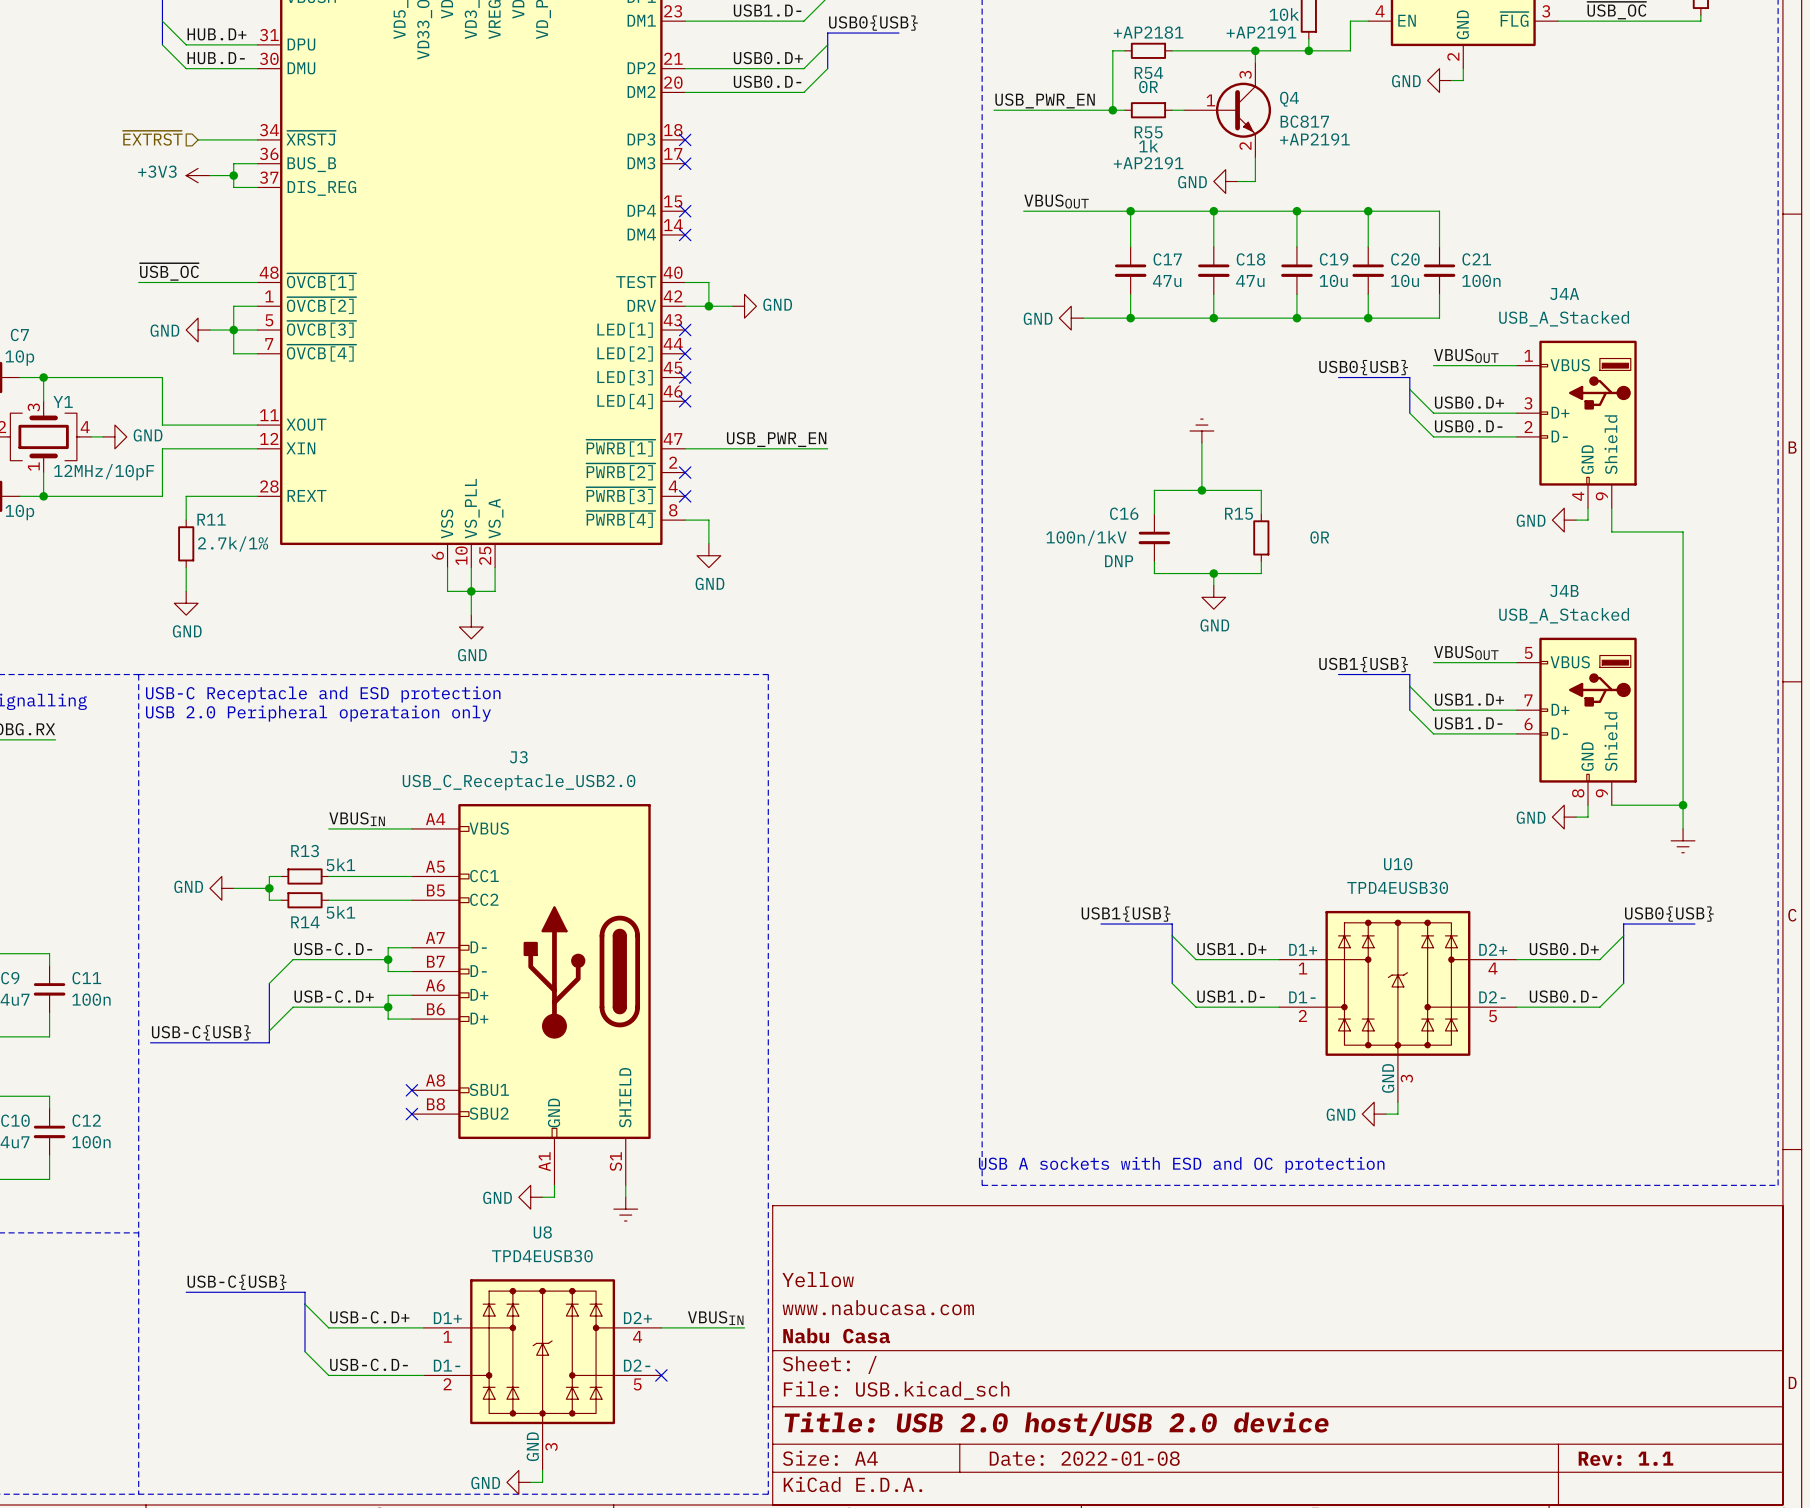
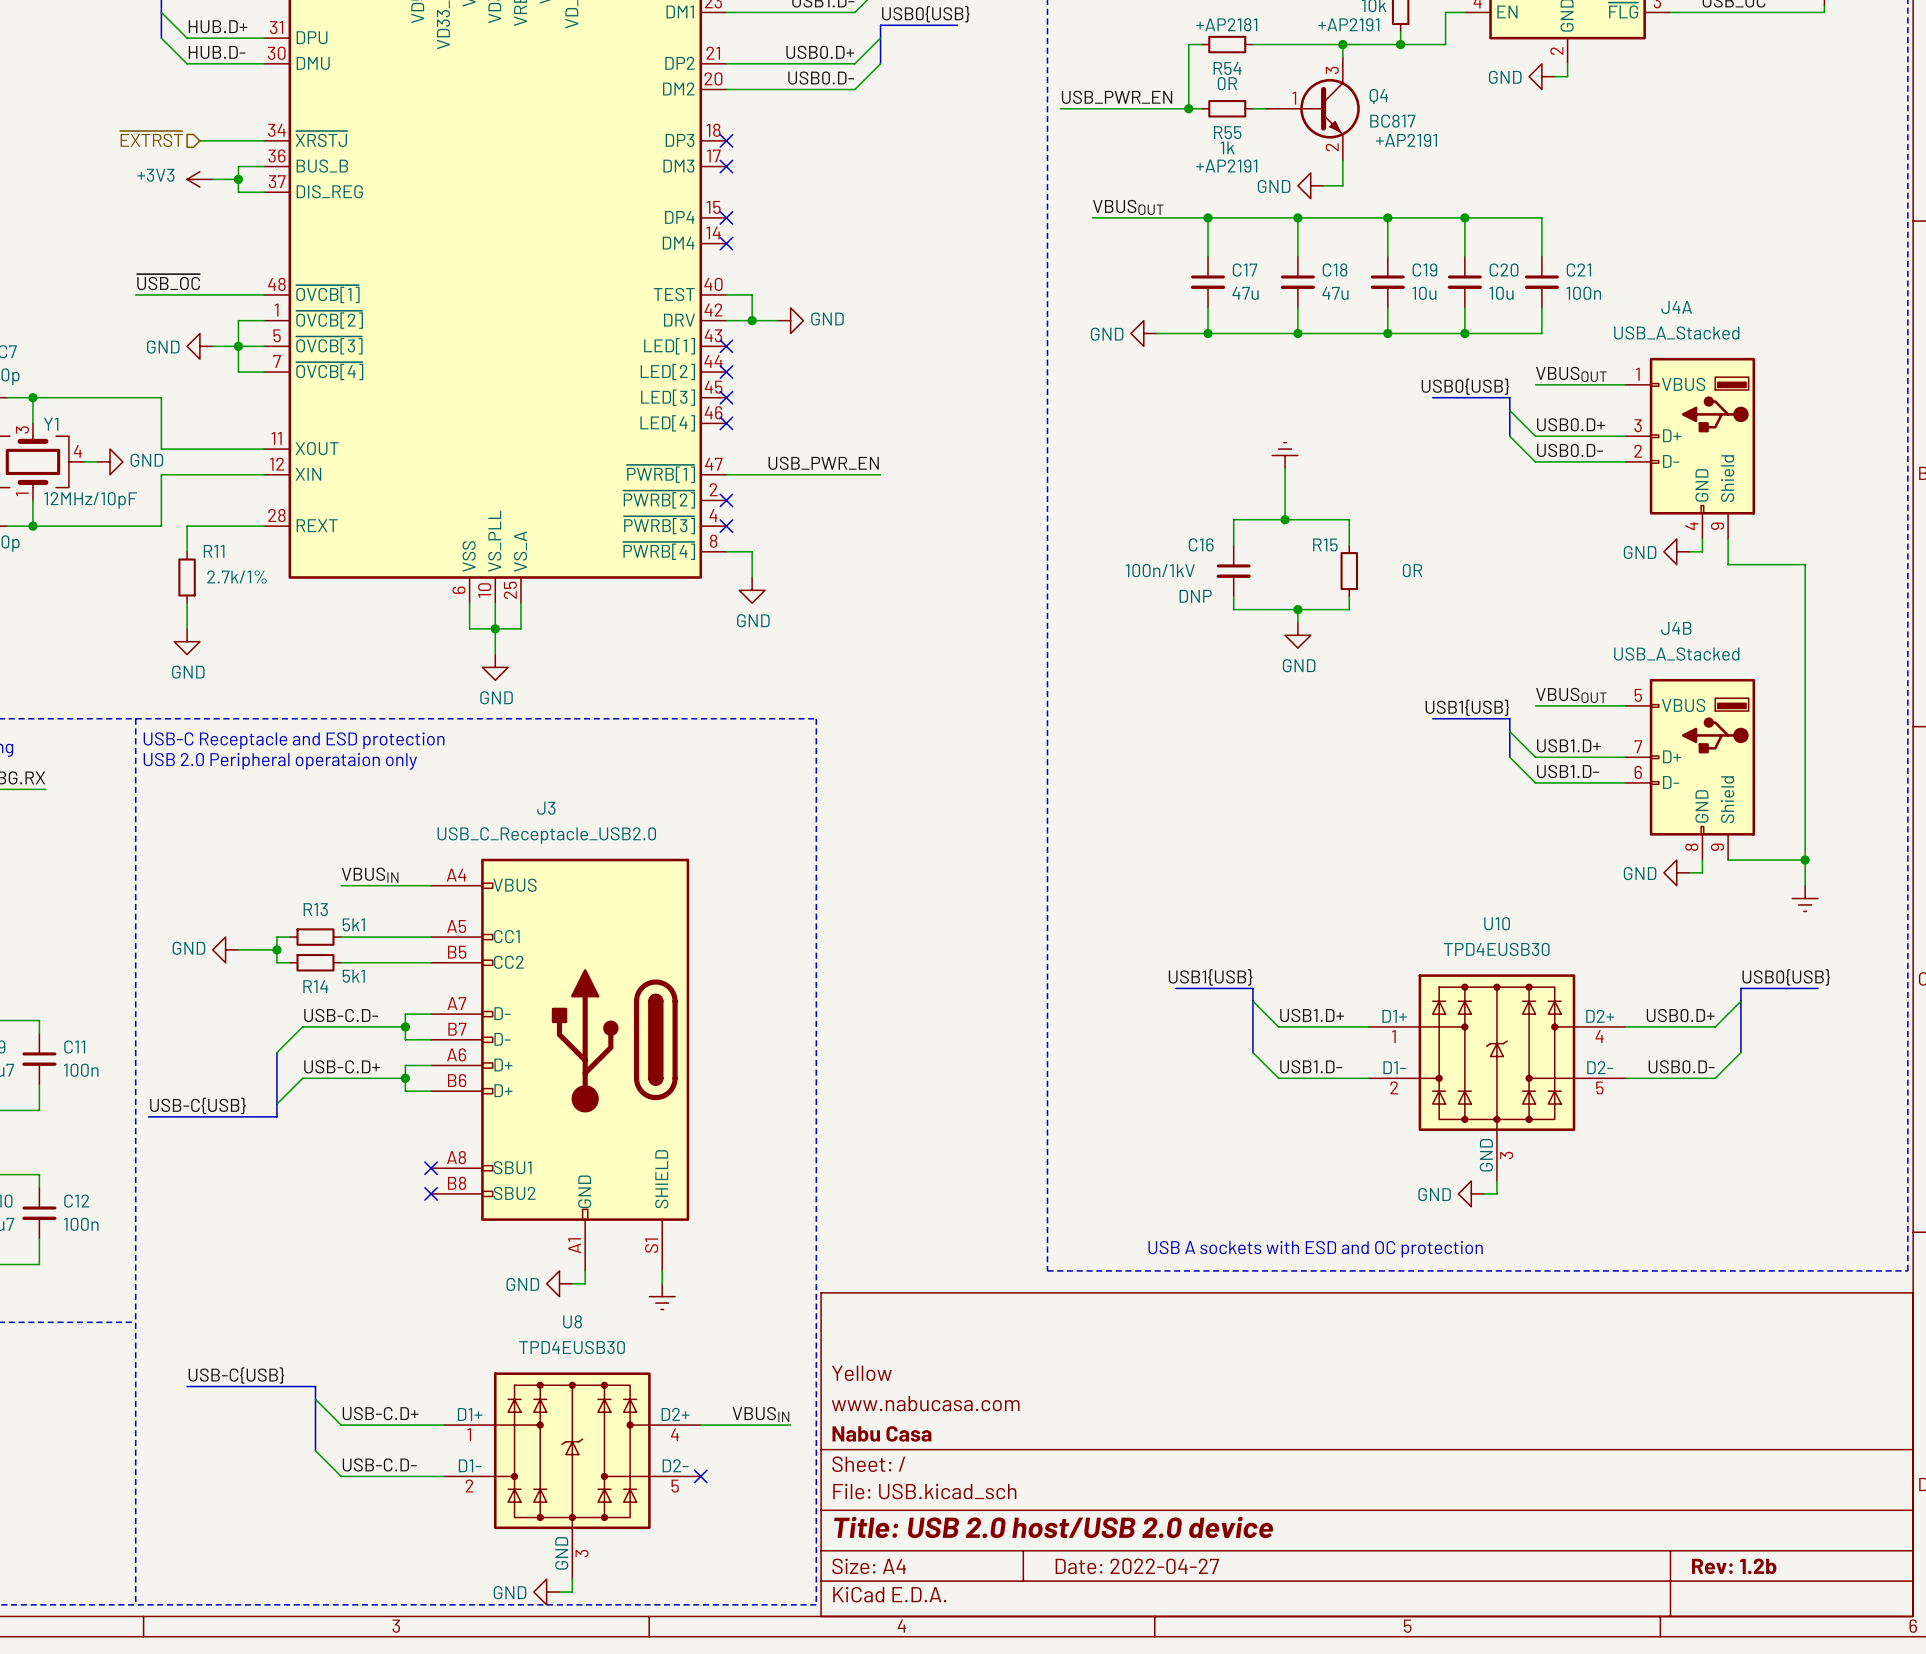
title block: Date: 2022-01-08 (1084, 1458) -> Date: 2022-04-27 (1137, 1566)
title block: Rev: 1.1 (1625, 1458) -> Rev: 1.2b (1734, 1566)

